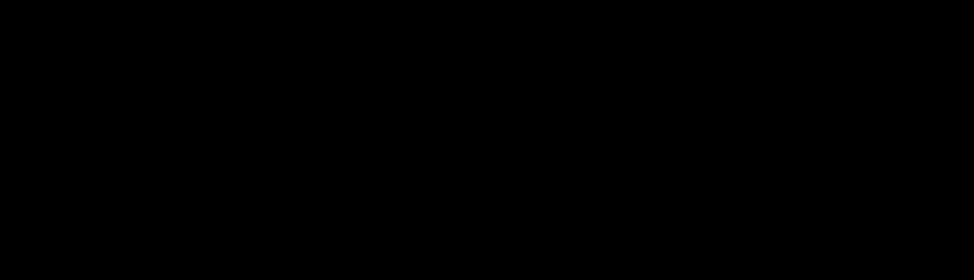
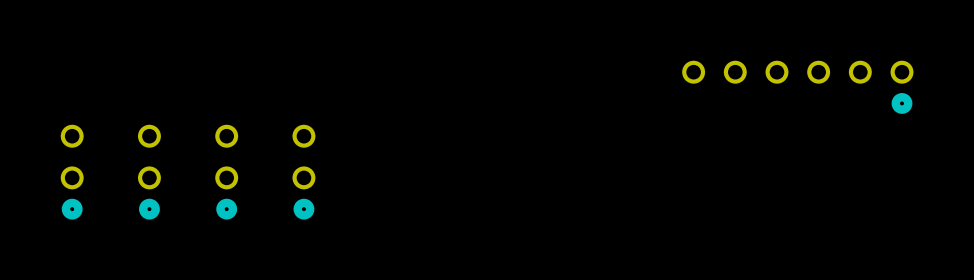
part: none -> (797, 87)
part: none -> (72, 172)
part: none -> (149, 172)
part: none -> (226, 172)
part: none -> (303, 172)

